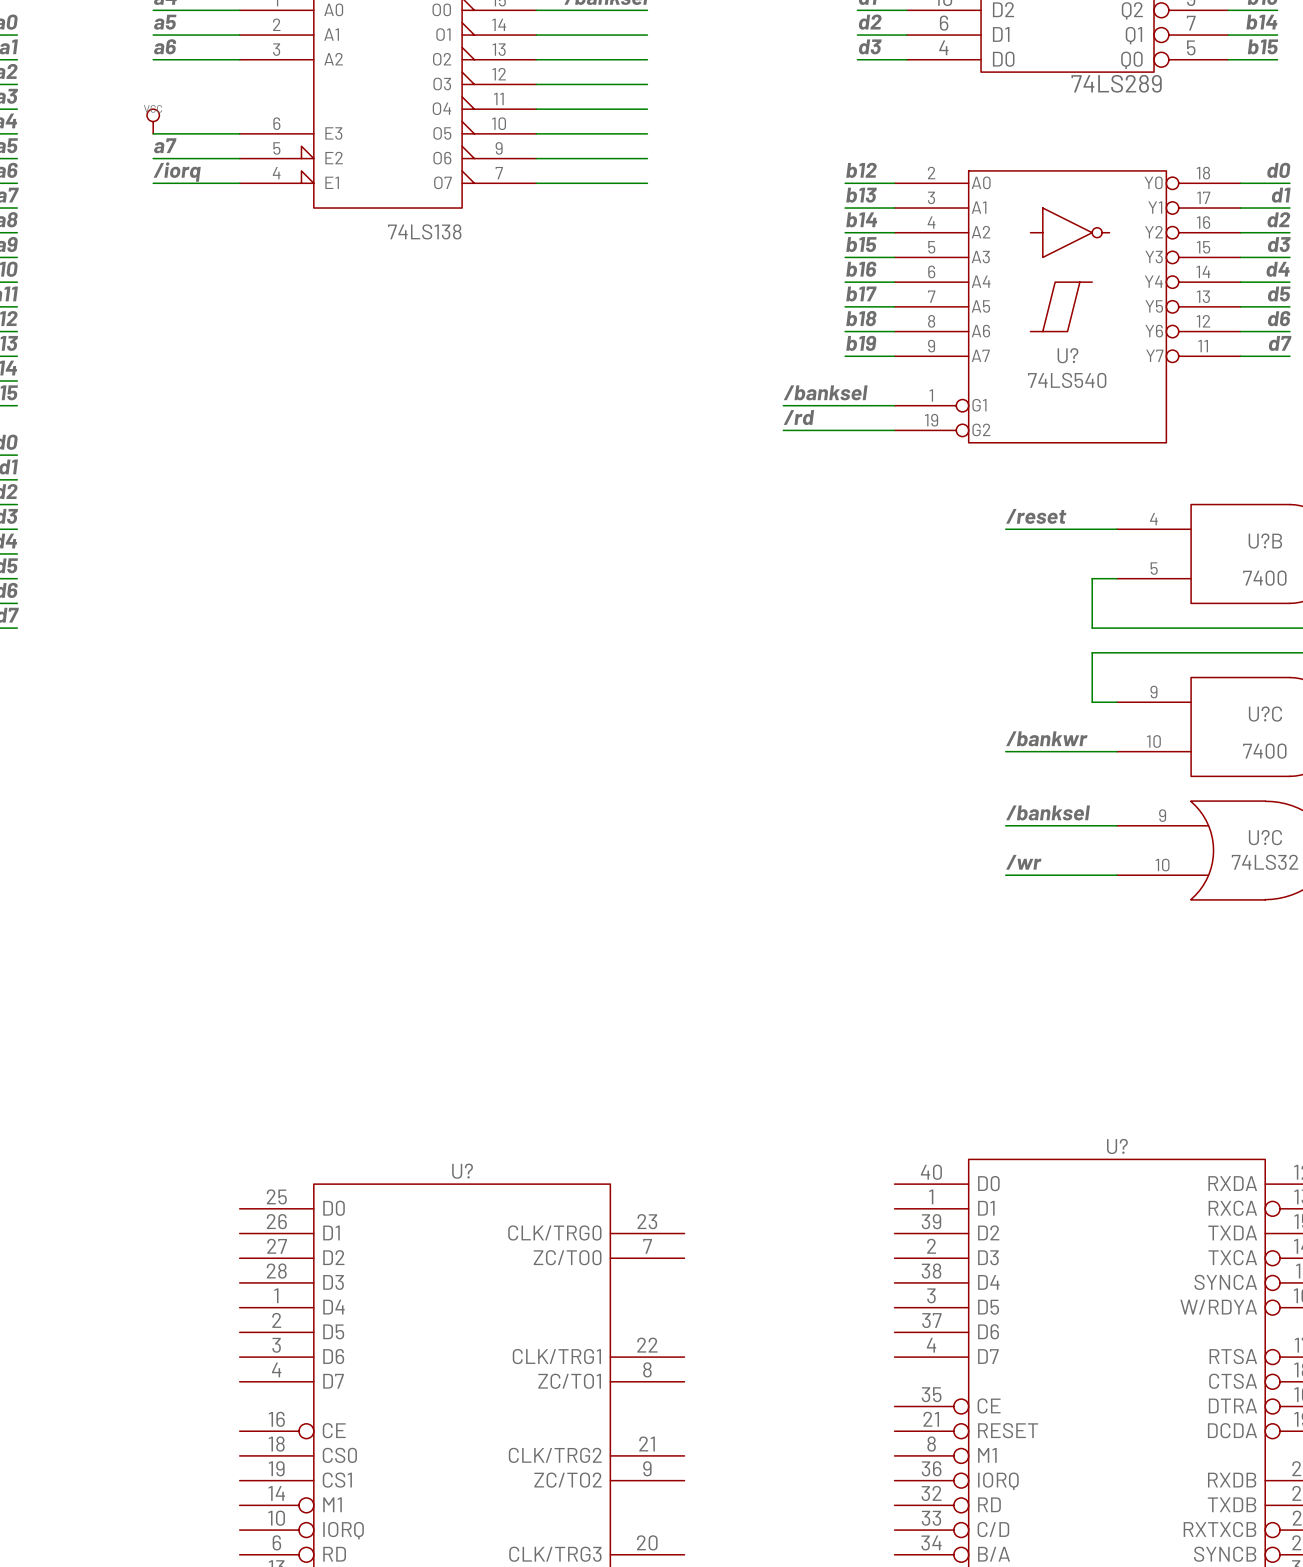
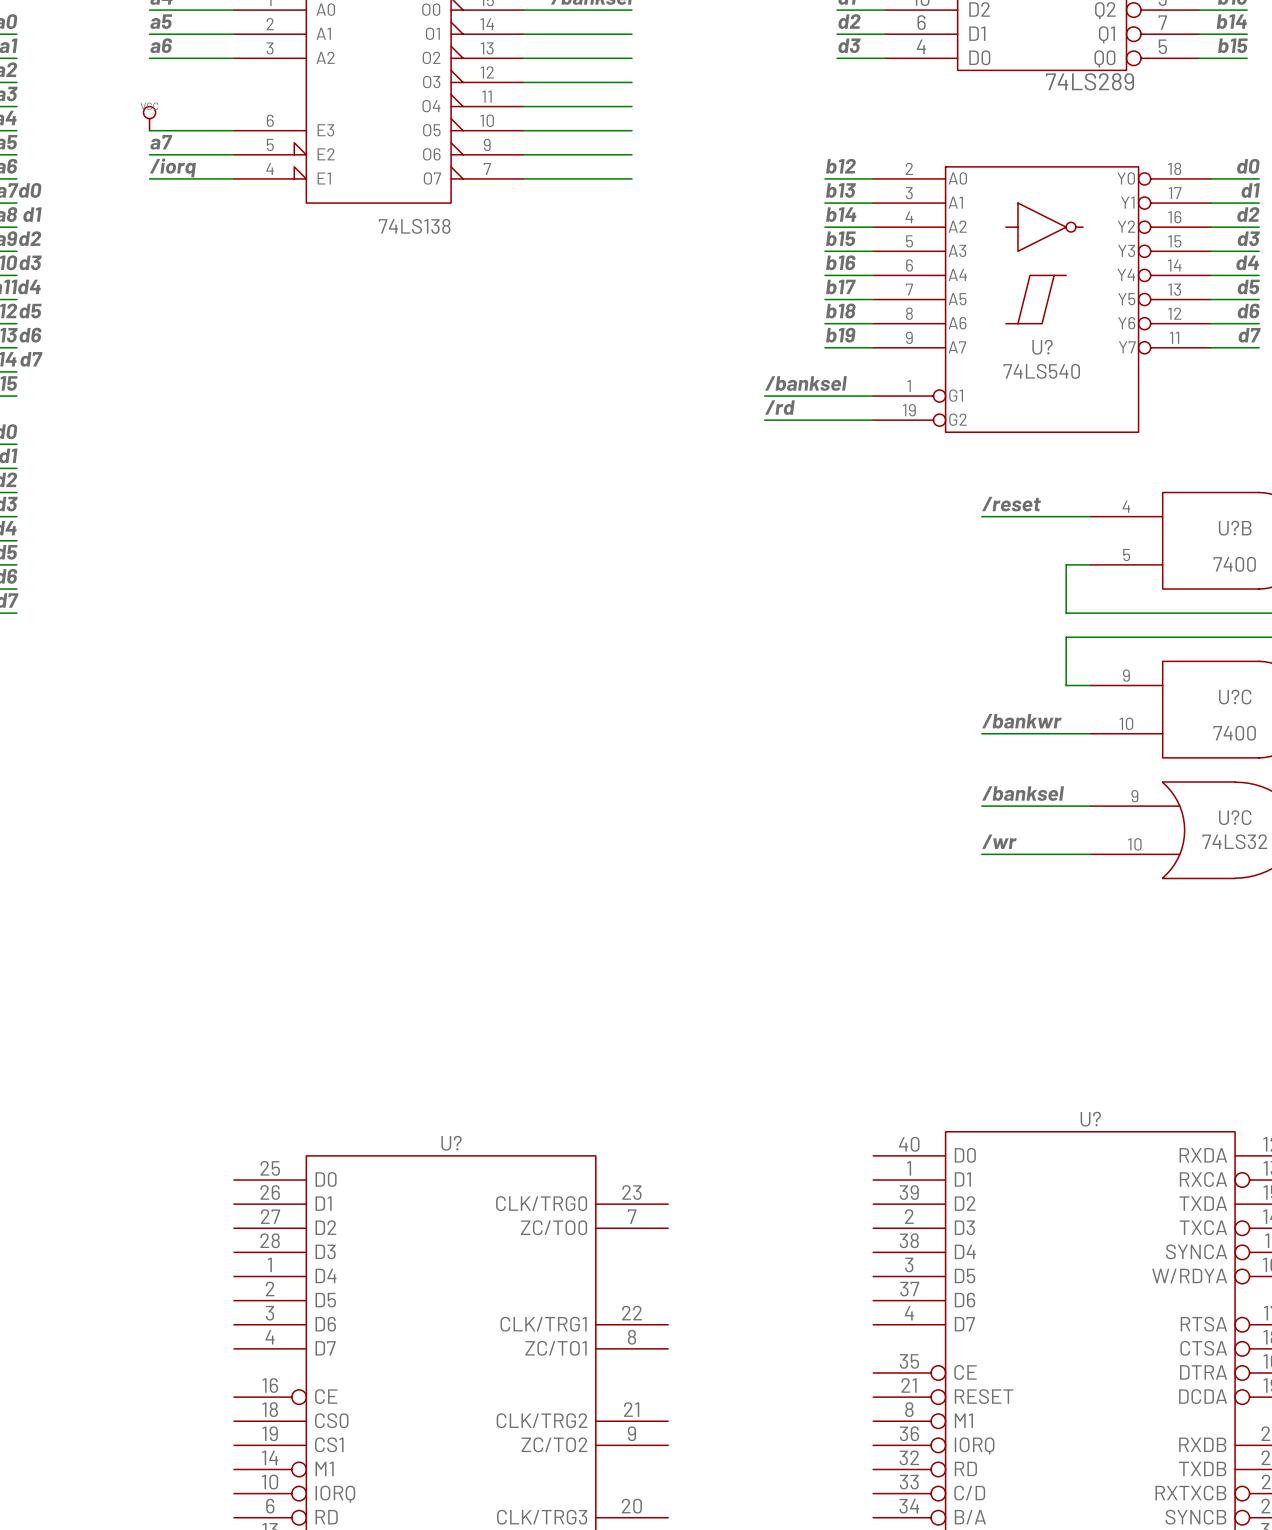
label: none -> d0 (30, 190)
label: none -> d1 (32, 214)
label: none -> d2 (30, 238)
label: none -> d3 (30, 262)
label: none -> d4 (29, 287)
label: none -> d5 (30, 311)
label: none -> d6 (30, 335)
label: none -> d7 (31, 359)

